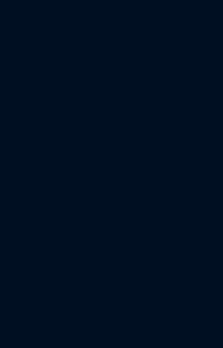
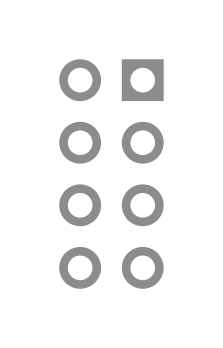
part: none -> (111, 174)

